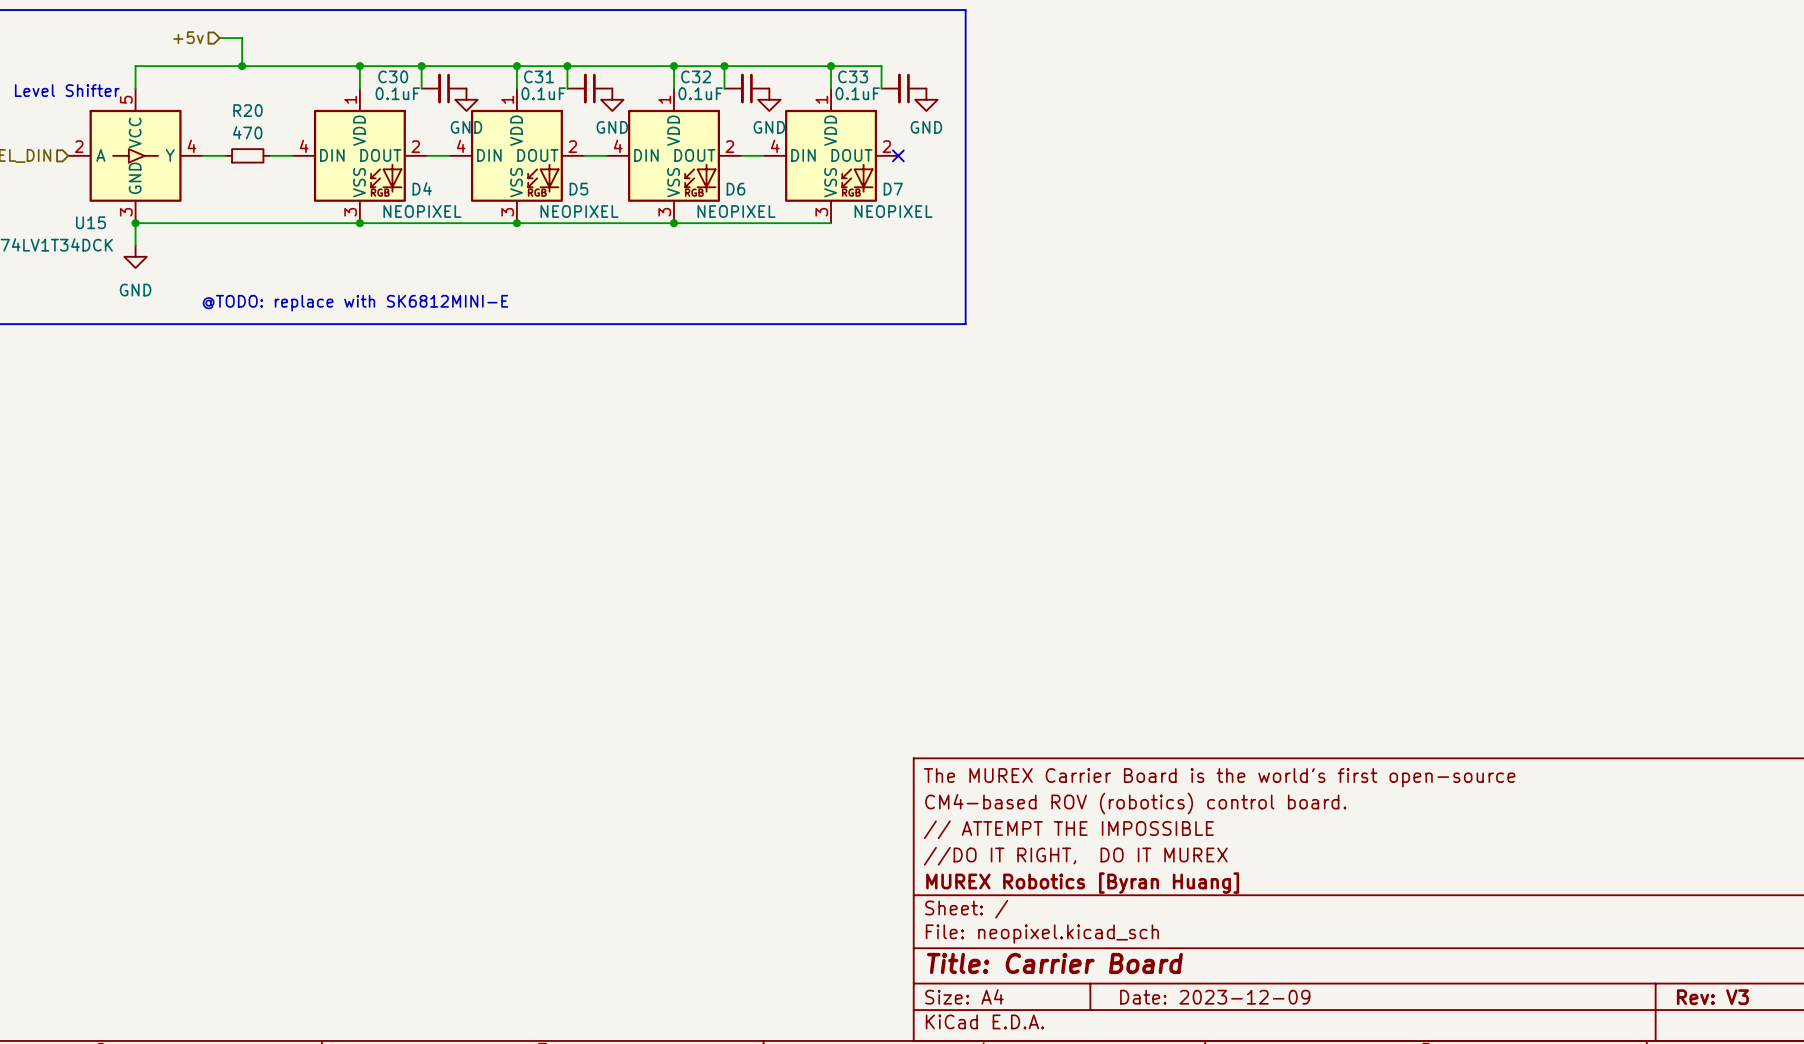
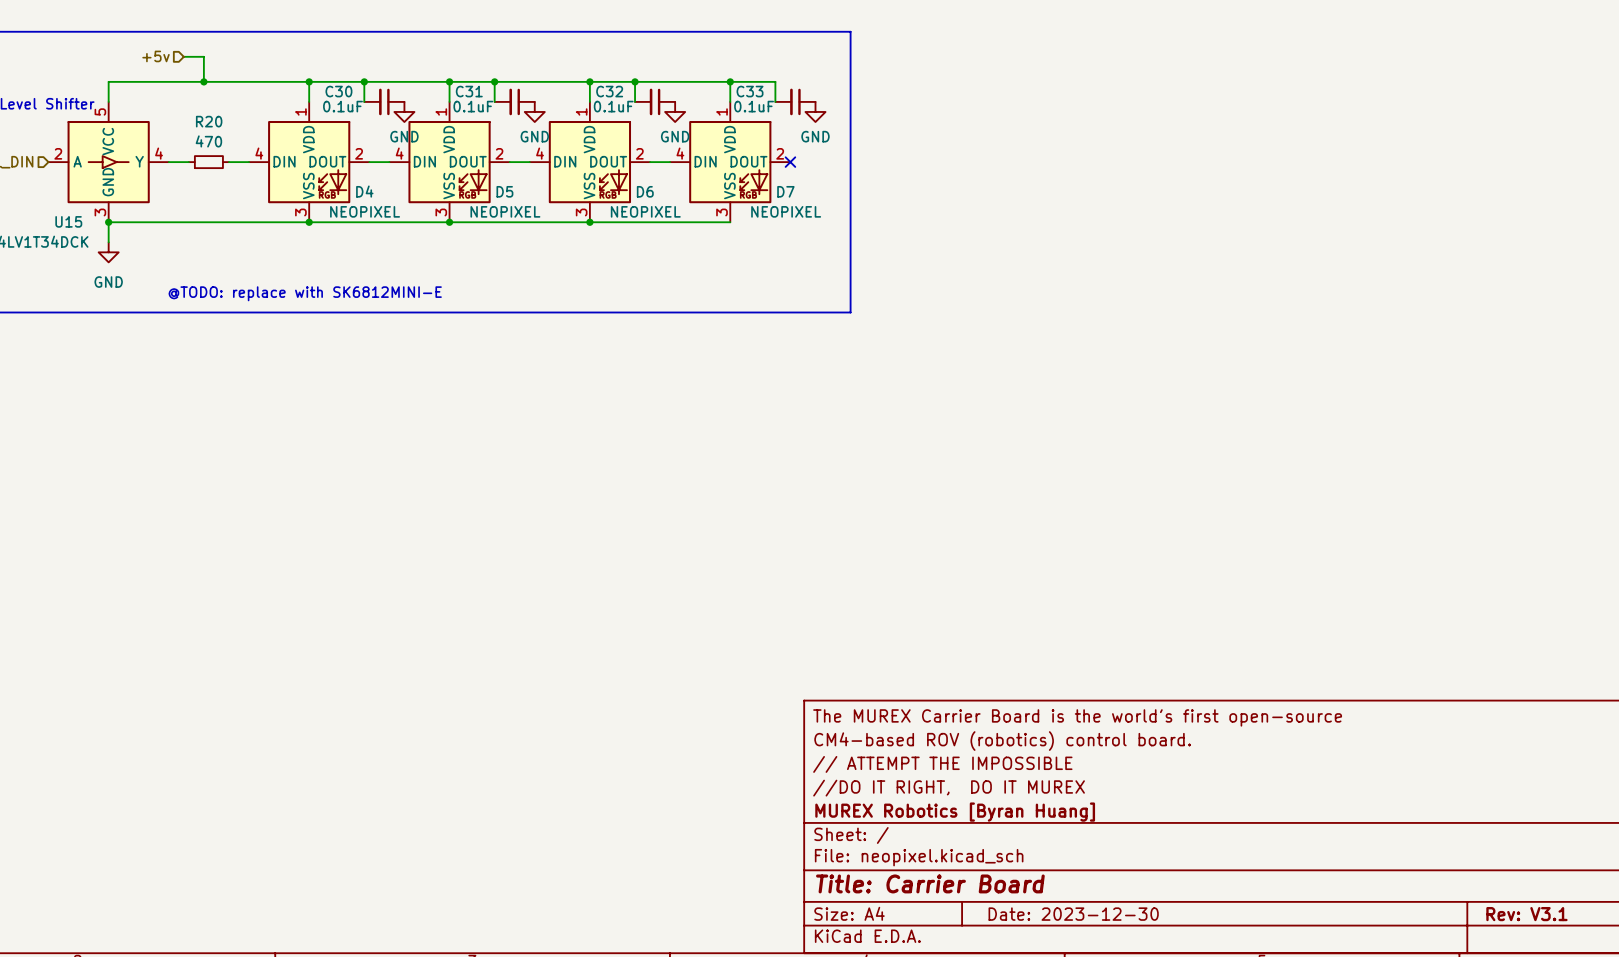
title block: Date: 2023-12-09 (1215, 997) -> Date: 2023-12-30 (1073, 914)
title block: Rev: V3 (1712, 997) -> Rev: V3.1 (1526, 914)

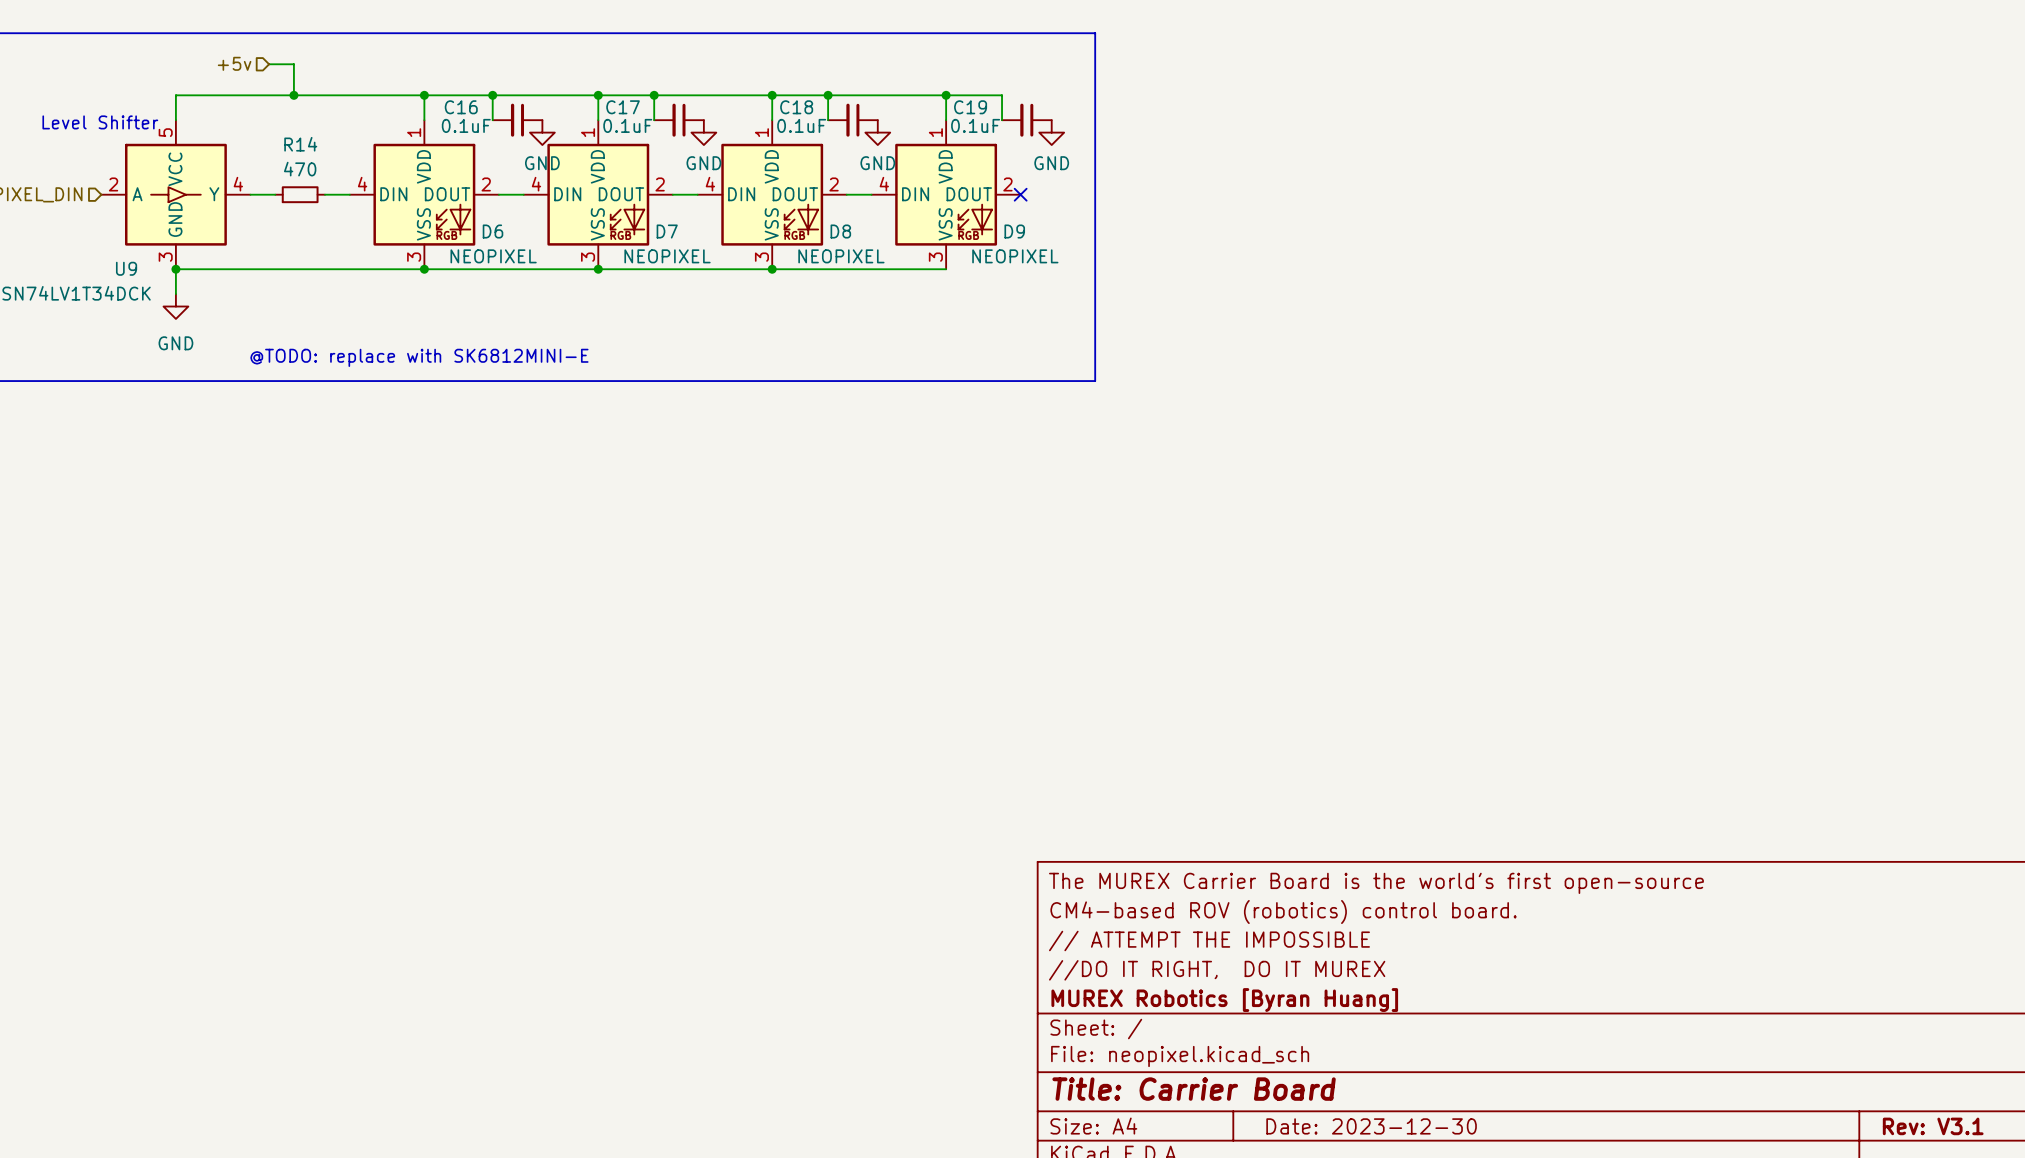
C30 name: C30 (338, 91) -> C16 (461, 107)
C31 name: C31 (469, 91) -> C17 (623, 107)
C32 name: C32 (609, 91) -> C18 (796, 107)
C33 name: C33 (750, 91) -> C19 (970, 107)
R20 name: R20 (209, 121) -> R14 (300, 144)
D4 name: D4 (364, 191) -> D6 (493, 231)
D5 name: D5 (504, 191) -> D7 (667, 231)
D6 name: D6 (645, 191) -> D8 (840, 231)
D7 name: D7 (785, 191) -> D9 (1014, 231)
U15 name: U15 (68, 221) -> U9 (126, 268)

